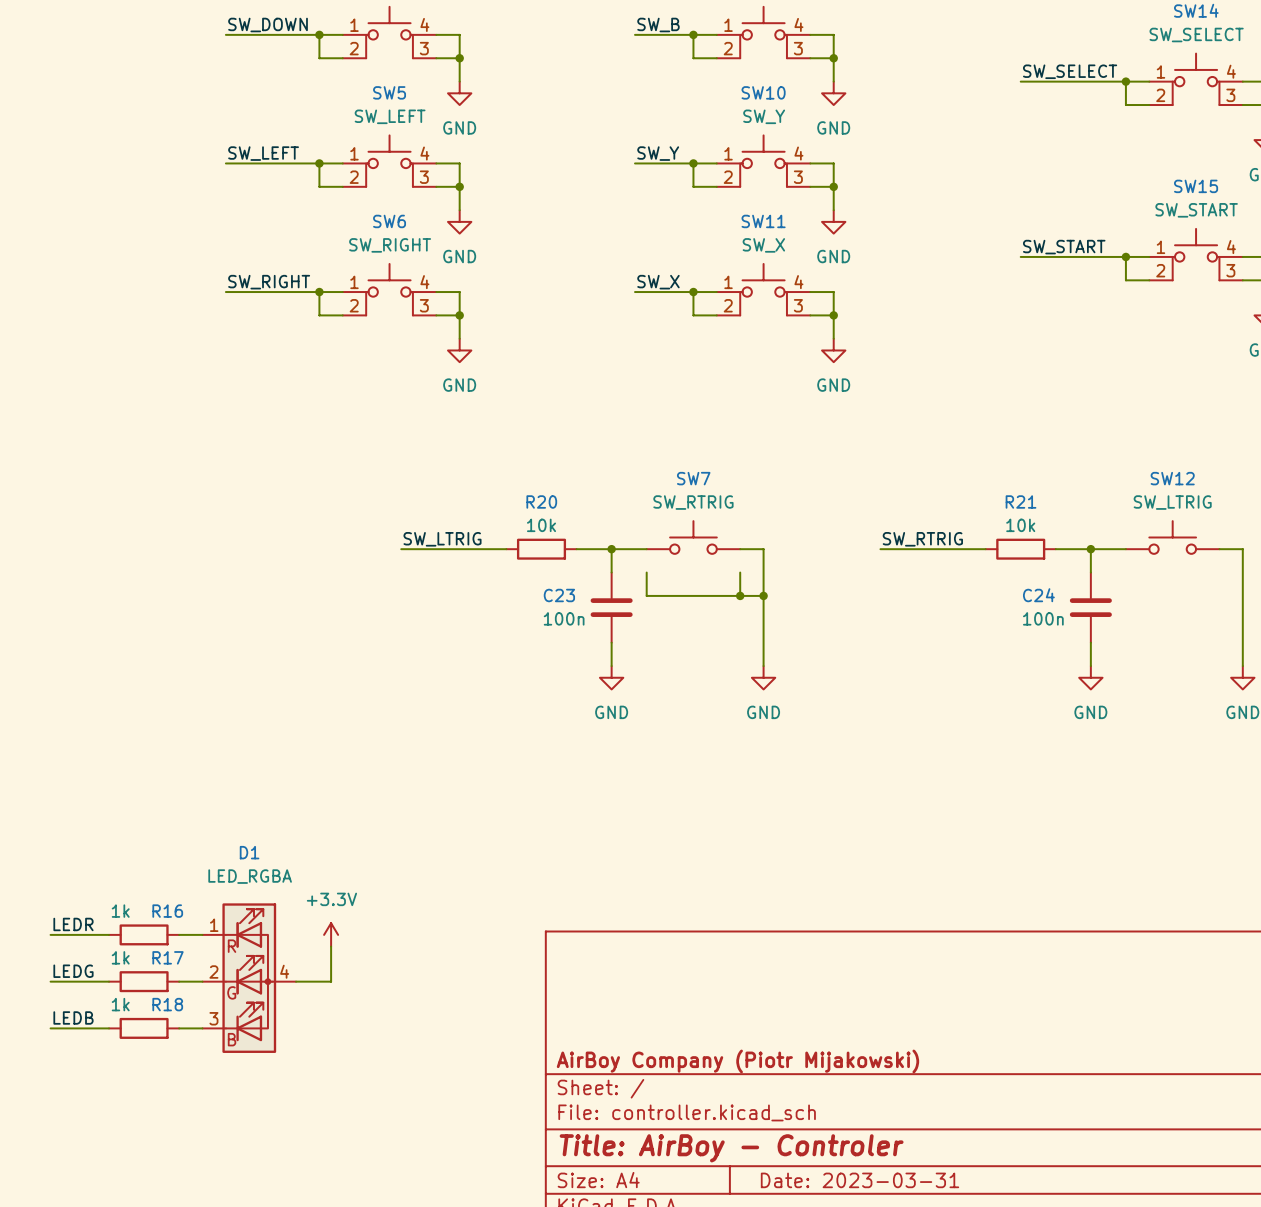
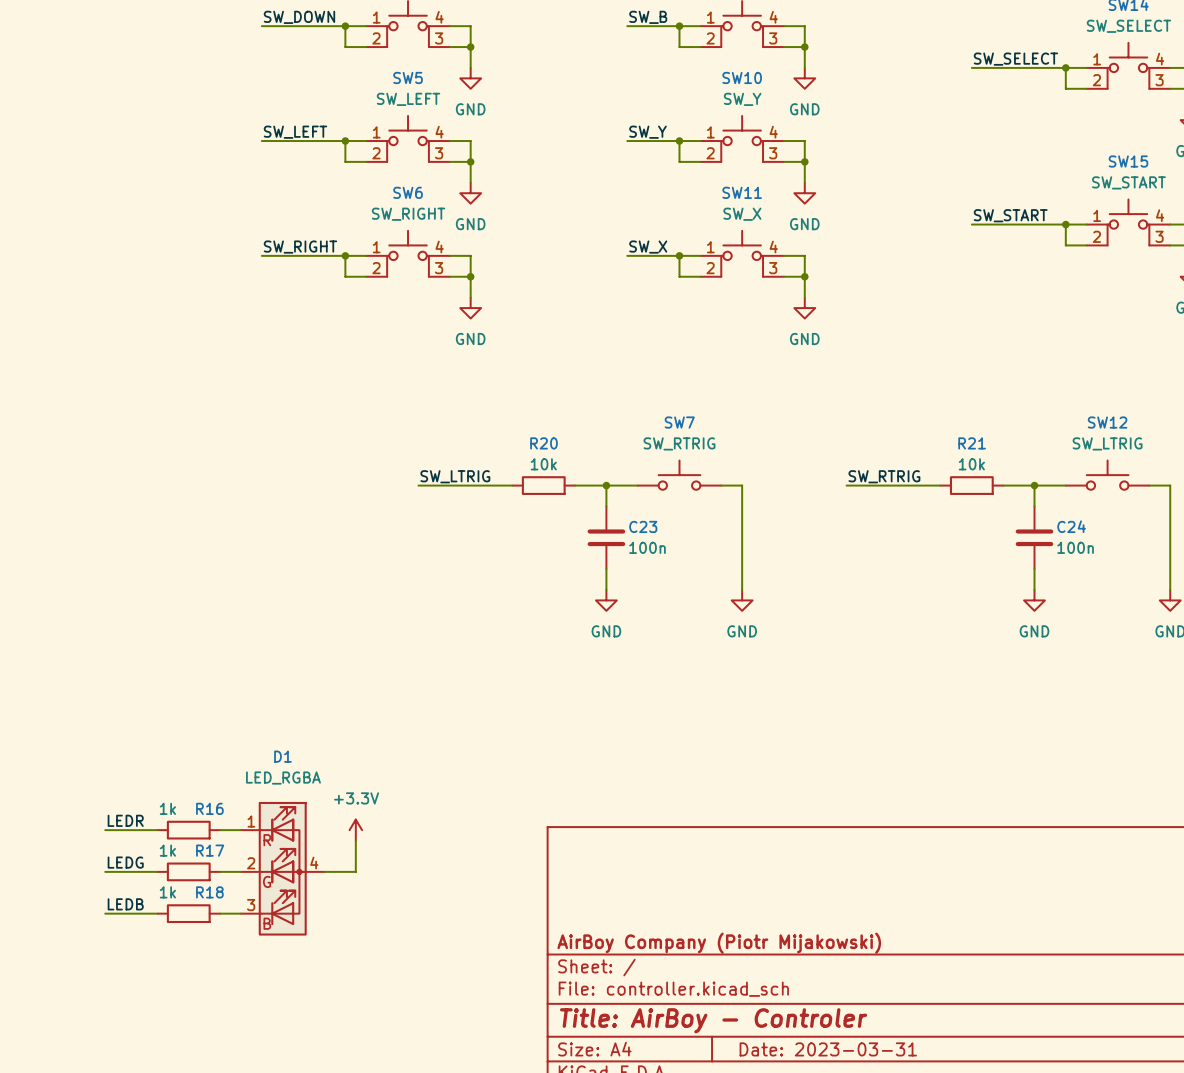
wire: (646, 572) (646, 595) (763, 595) -> none
wire: (740, 572) (740, 595) -> none
C23 name position: C23 (559, 595) -> C23 (643, 526)
junction: (740, 595) -> none
junction: (763, 595) -> none
C24 name position: C24 (1038, 595) -> C24 (1071, 526)
C23 value position: 100n (564, 618) -> 100n (647, 547)
C24 value position: 100n (1043, 618) -> 100n (1075, 547)

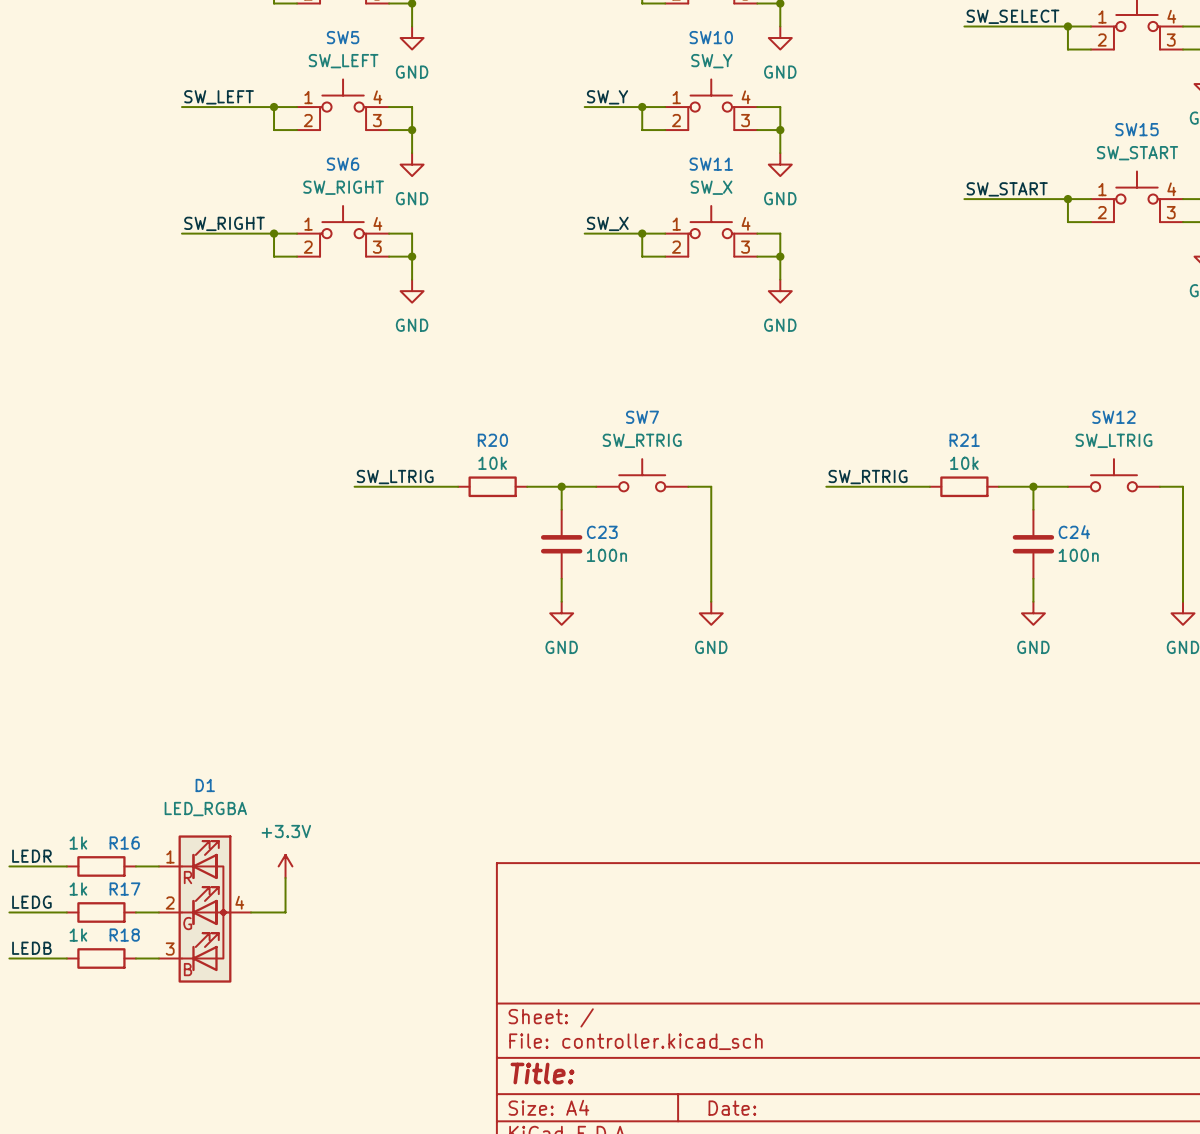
title block: AirBoy Company (Piotr Mijakowski) (719, 943) -> none
title block: Title: AirBoy - Controler (713, 1020) -> Title: (542, 1073)
title block: Date: 2023-03-31 (828, 1049) -> Date: (732, 1108)

